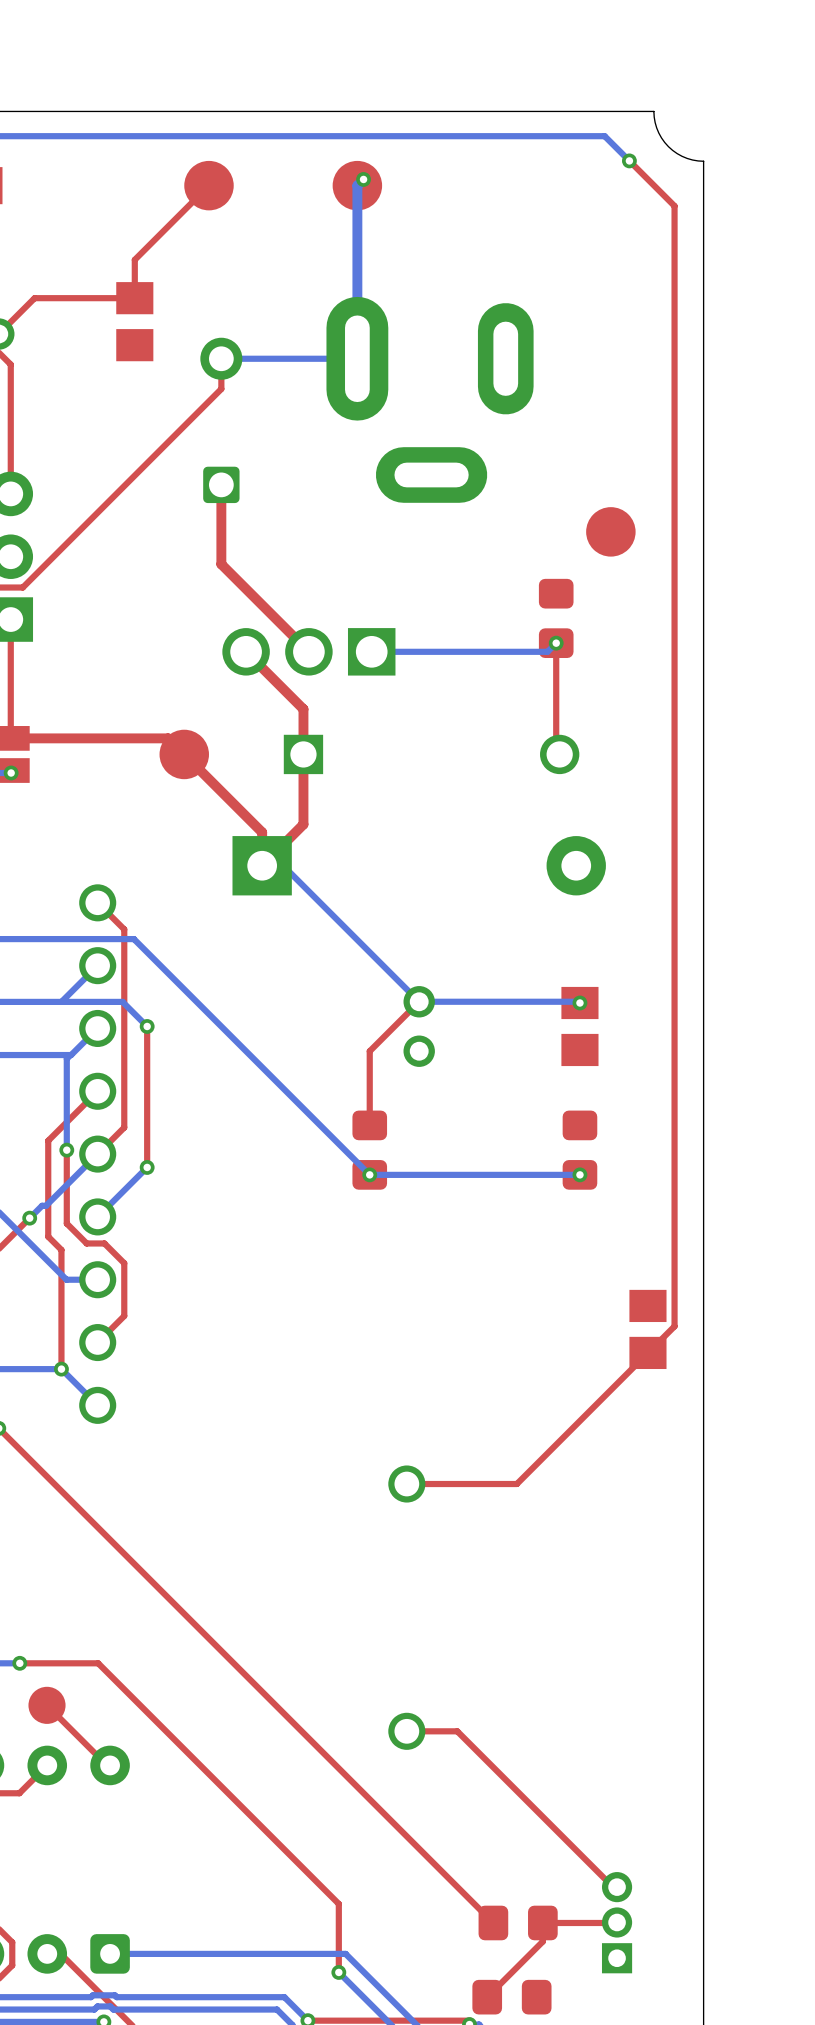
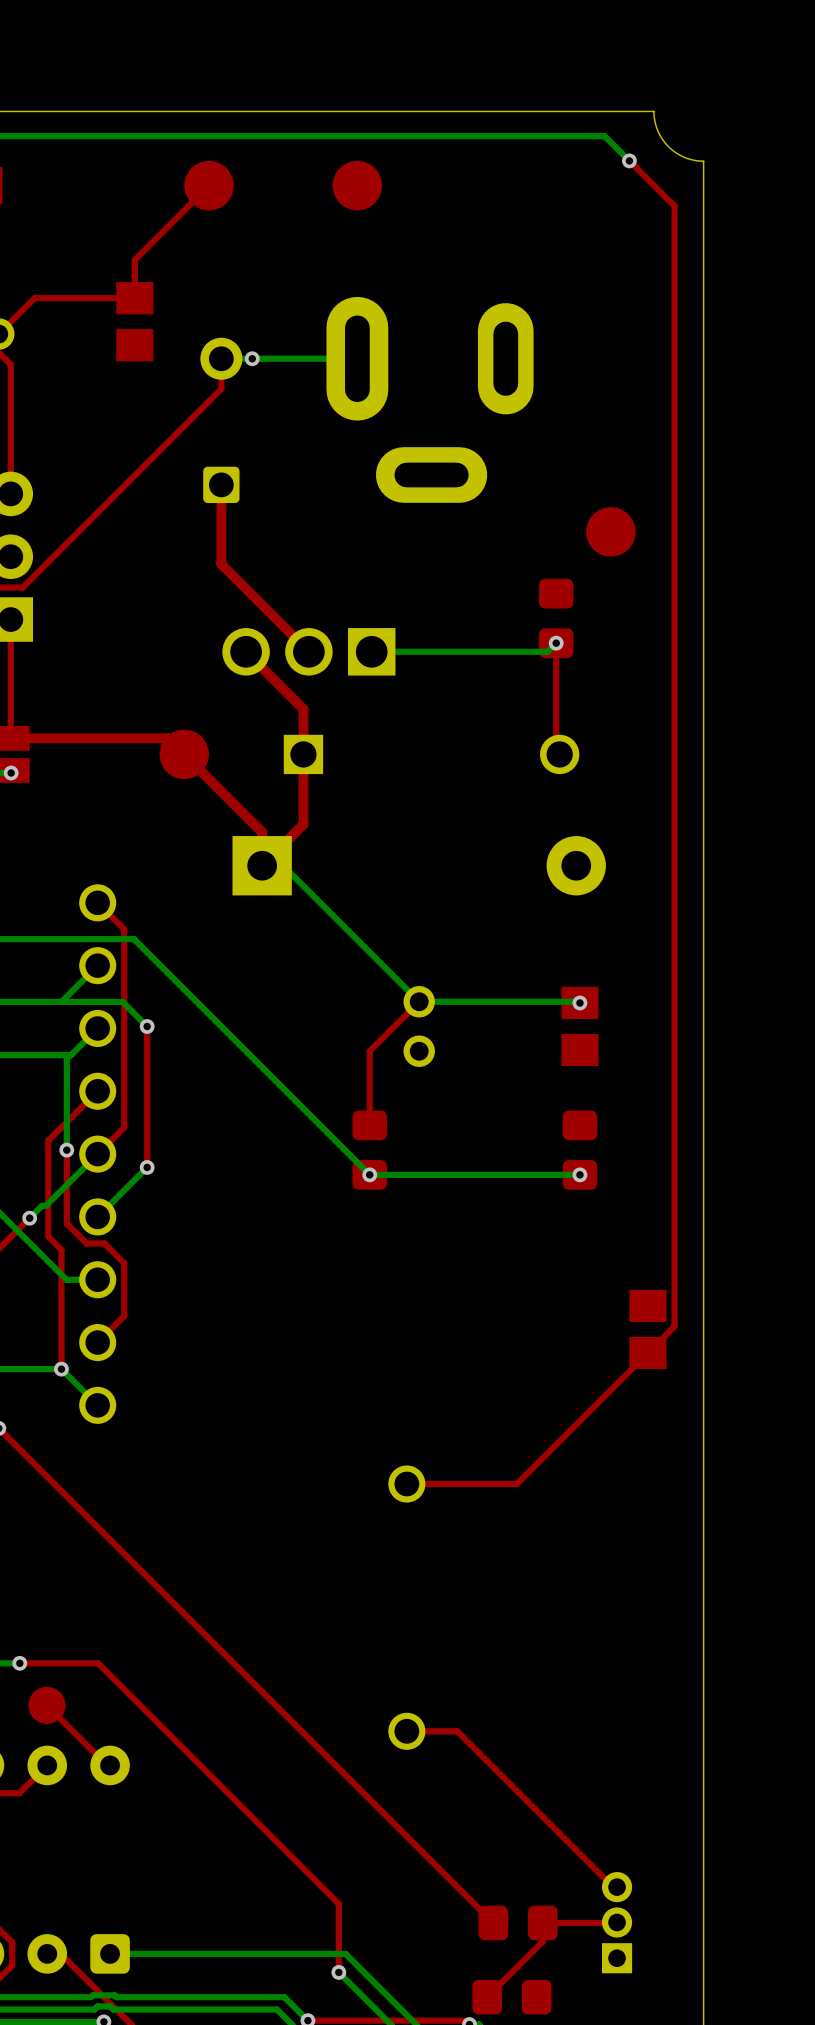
bottom track: (363, 179) (357, 185) (357, 358) -> none
via: (363, 179) -> none
via: none -> (252, 358)

